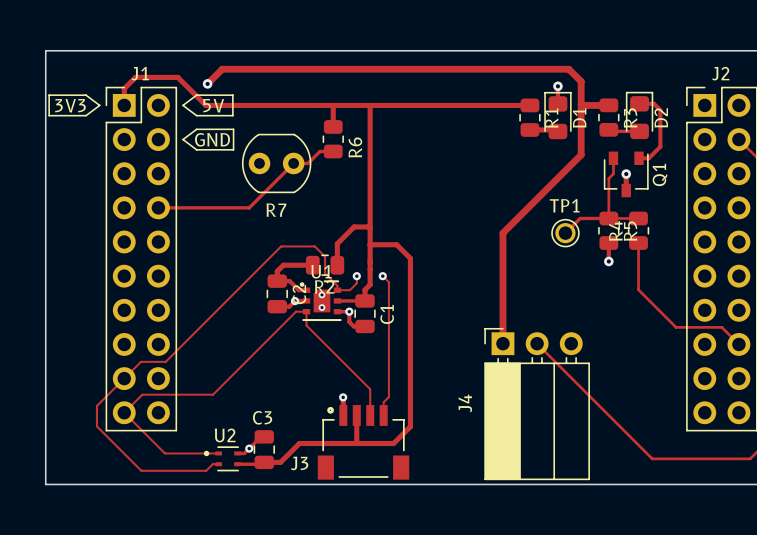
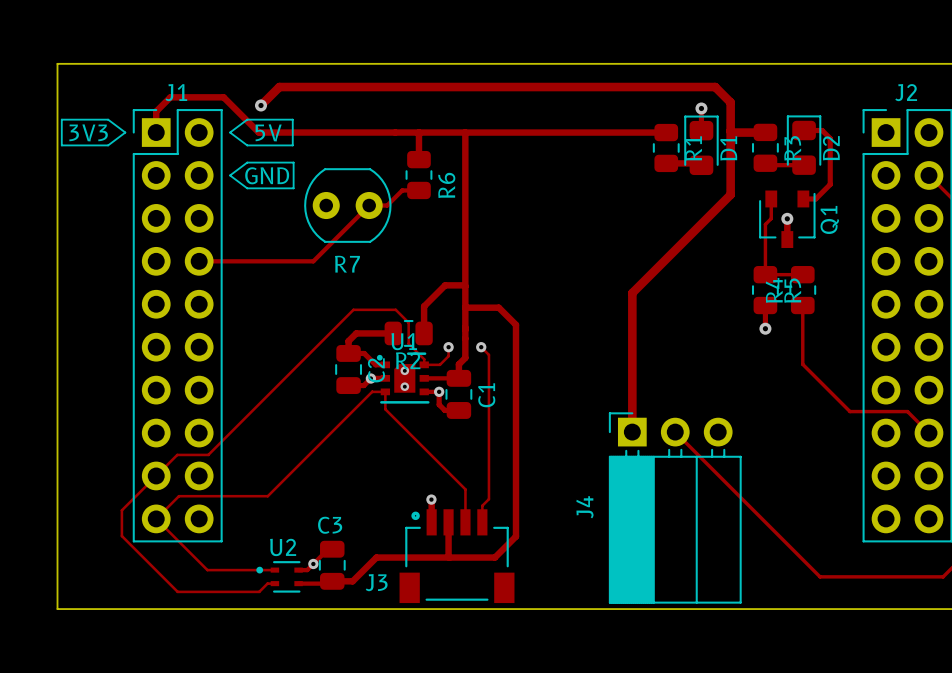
track: (608, 218) (580, 218) (565, 233) -> none
TP1: (565, 233) -> none

